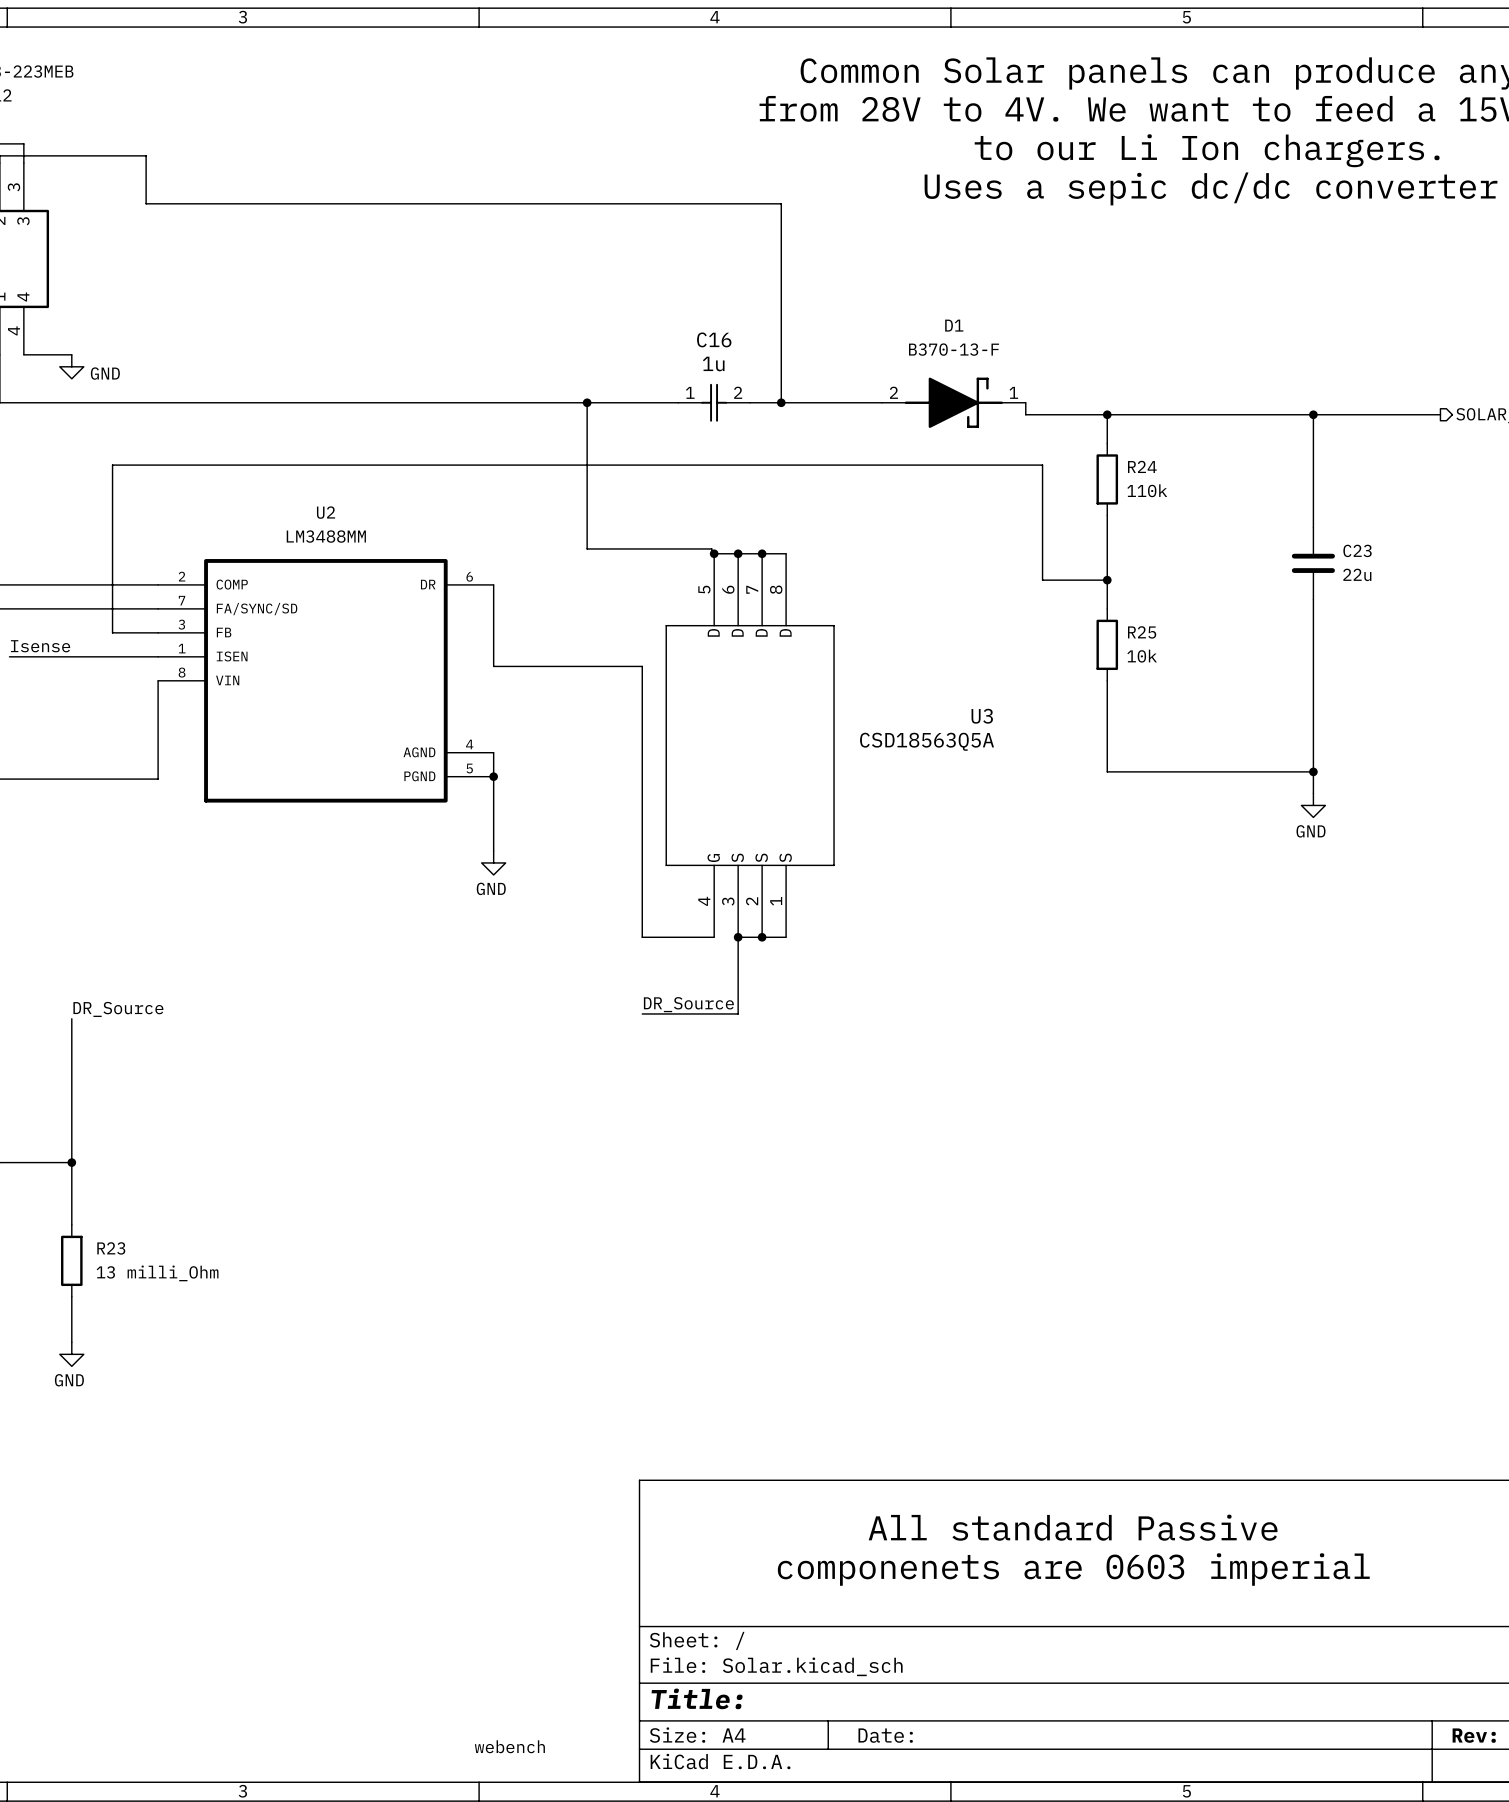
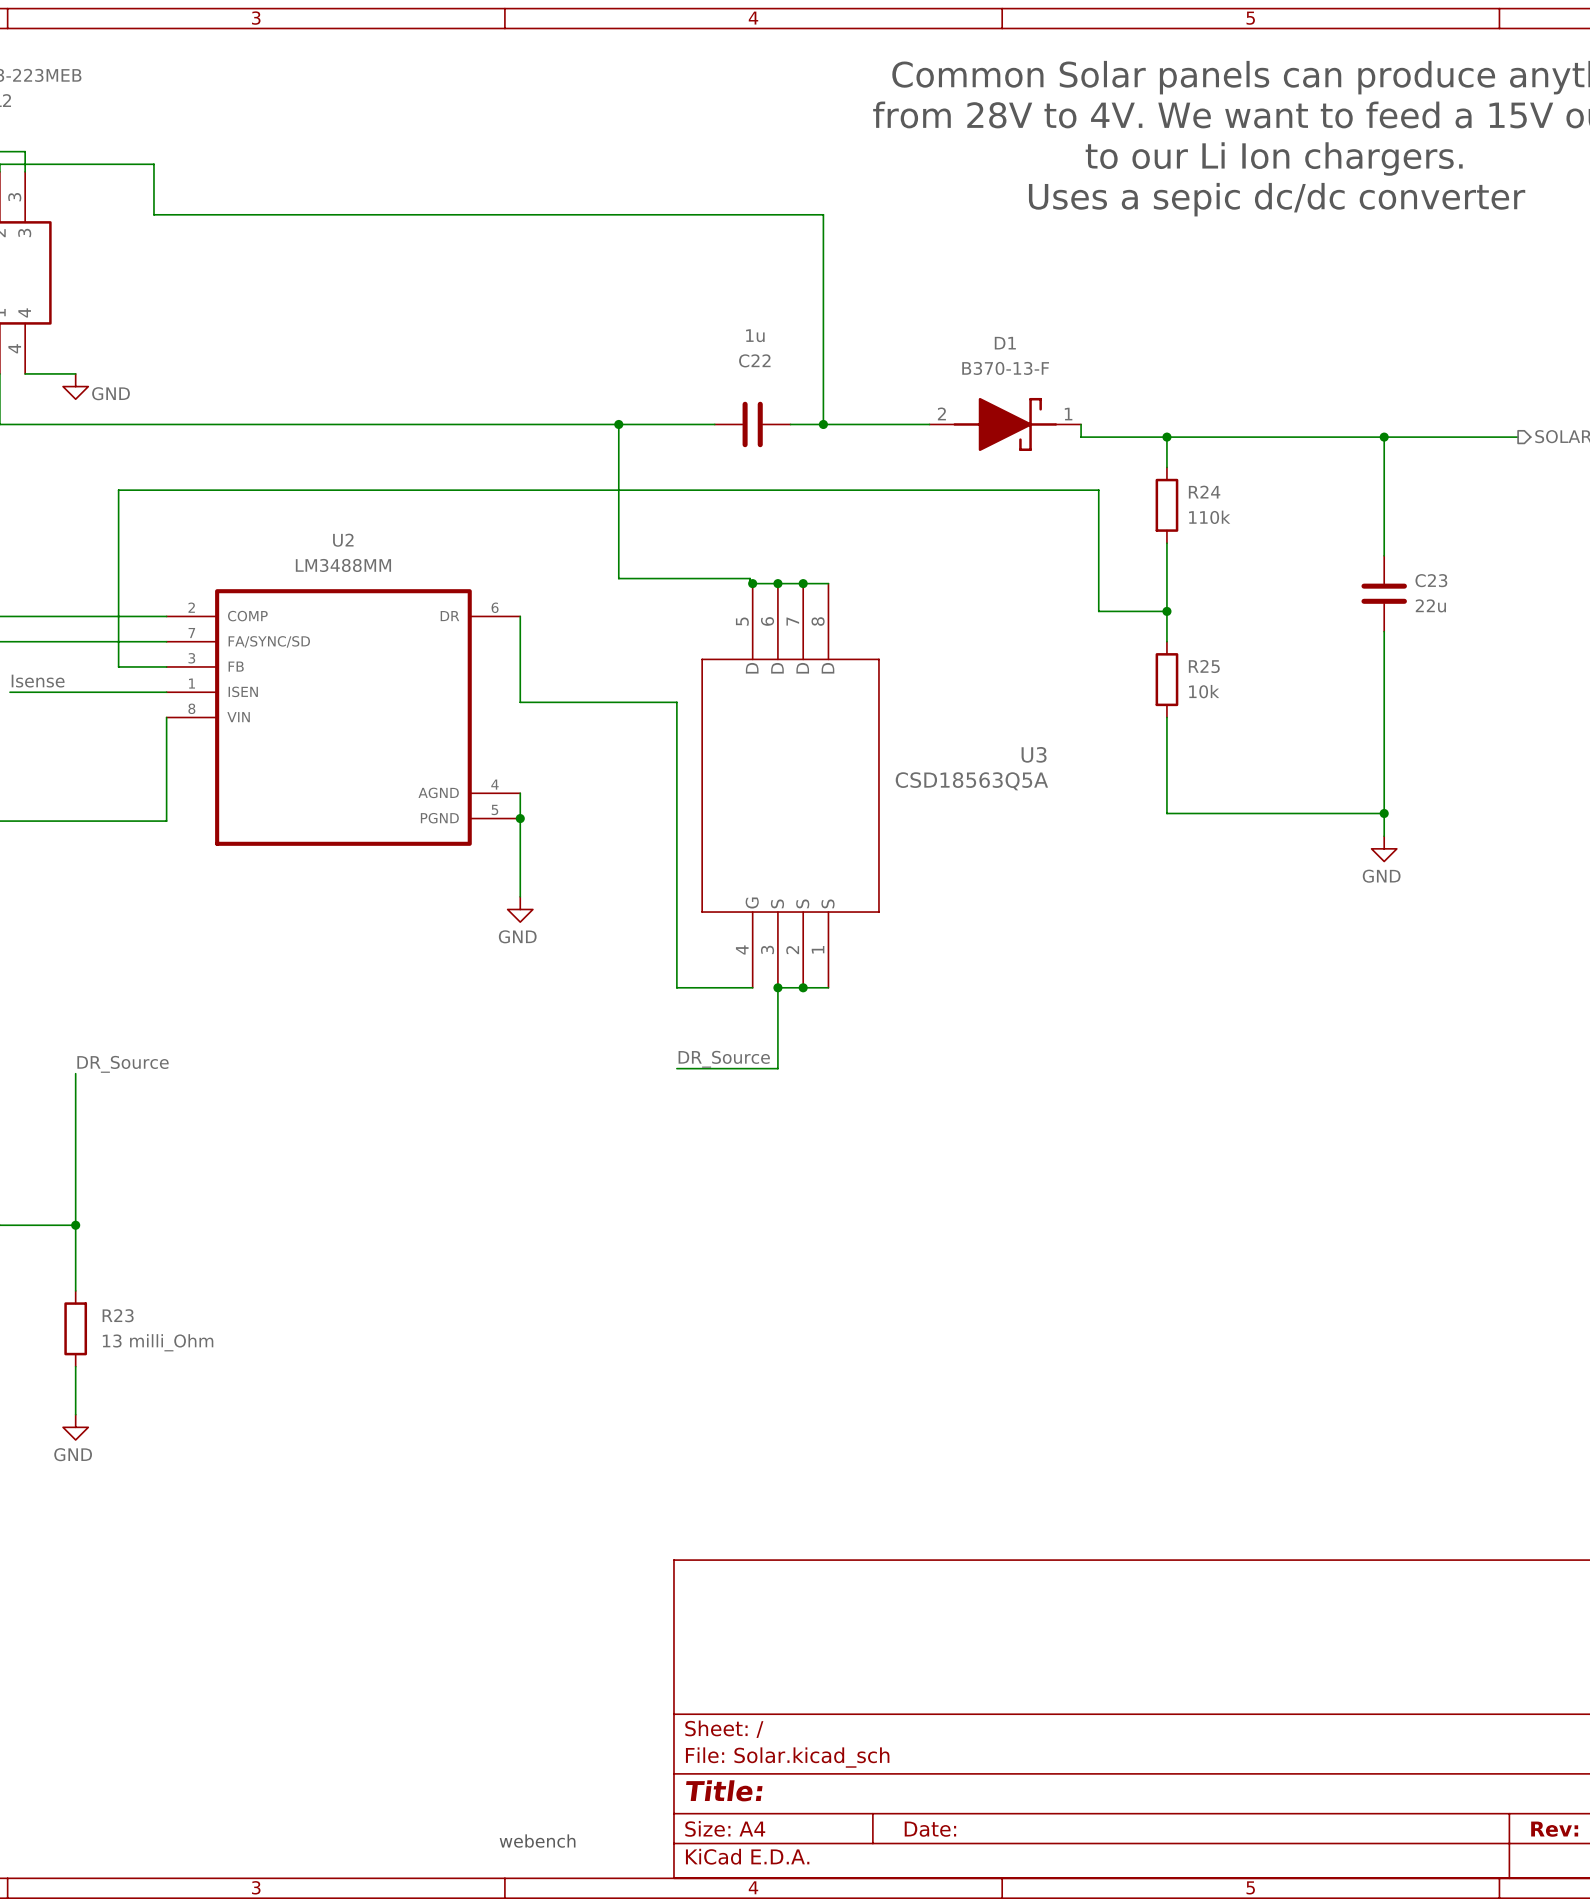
C16: 1u (714, 402) -> none
C22: none -> 1u (752, 424)
text: All standard Passive (1073, 1527) -> none
text: componenets are 0603 imperial (1073, 1569) -> none

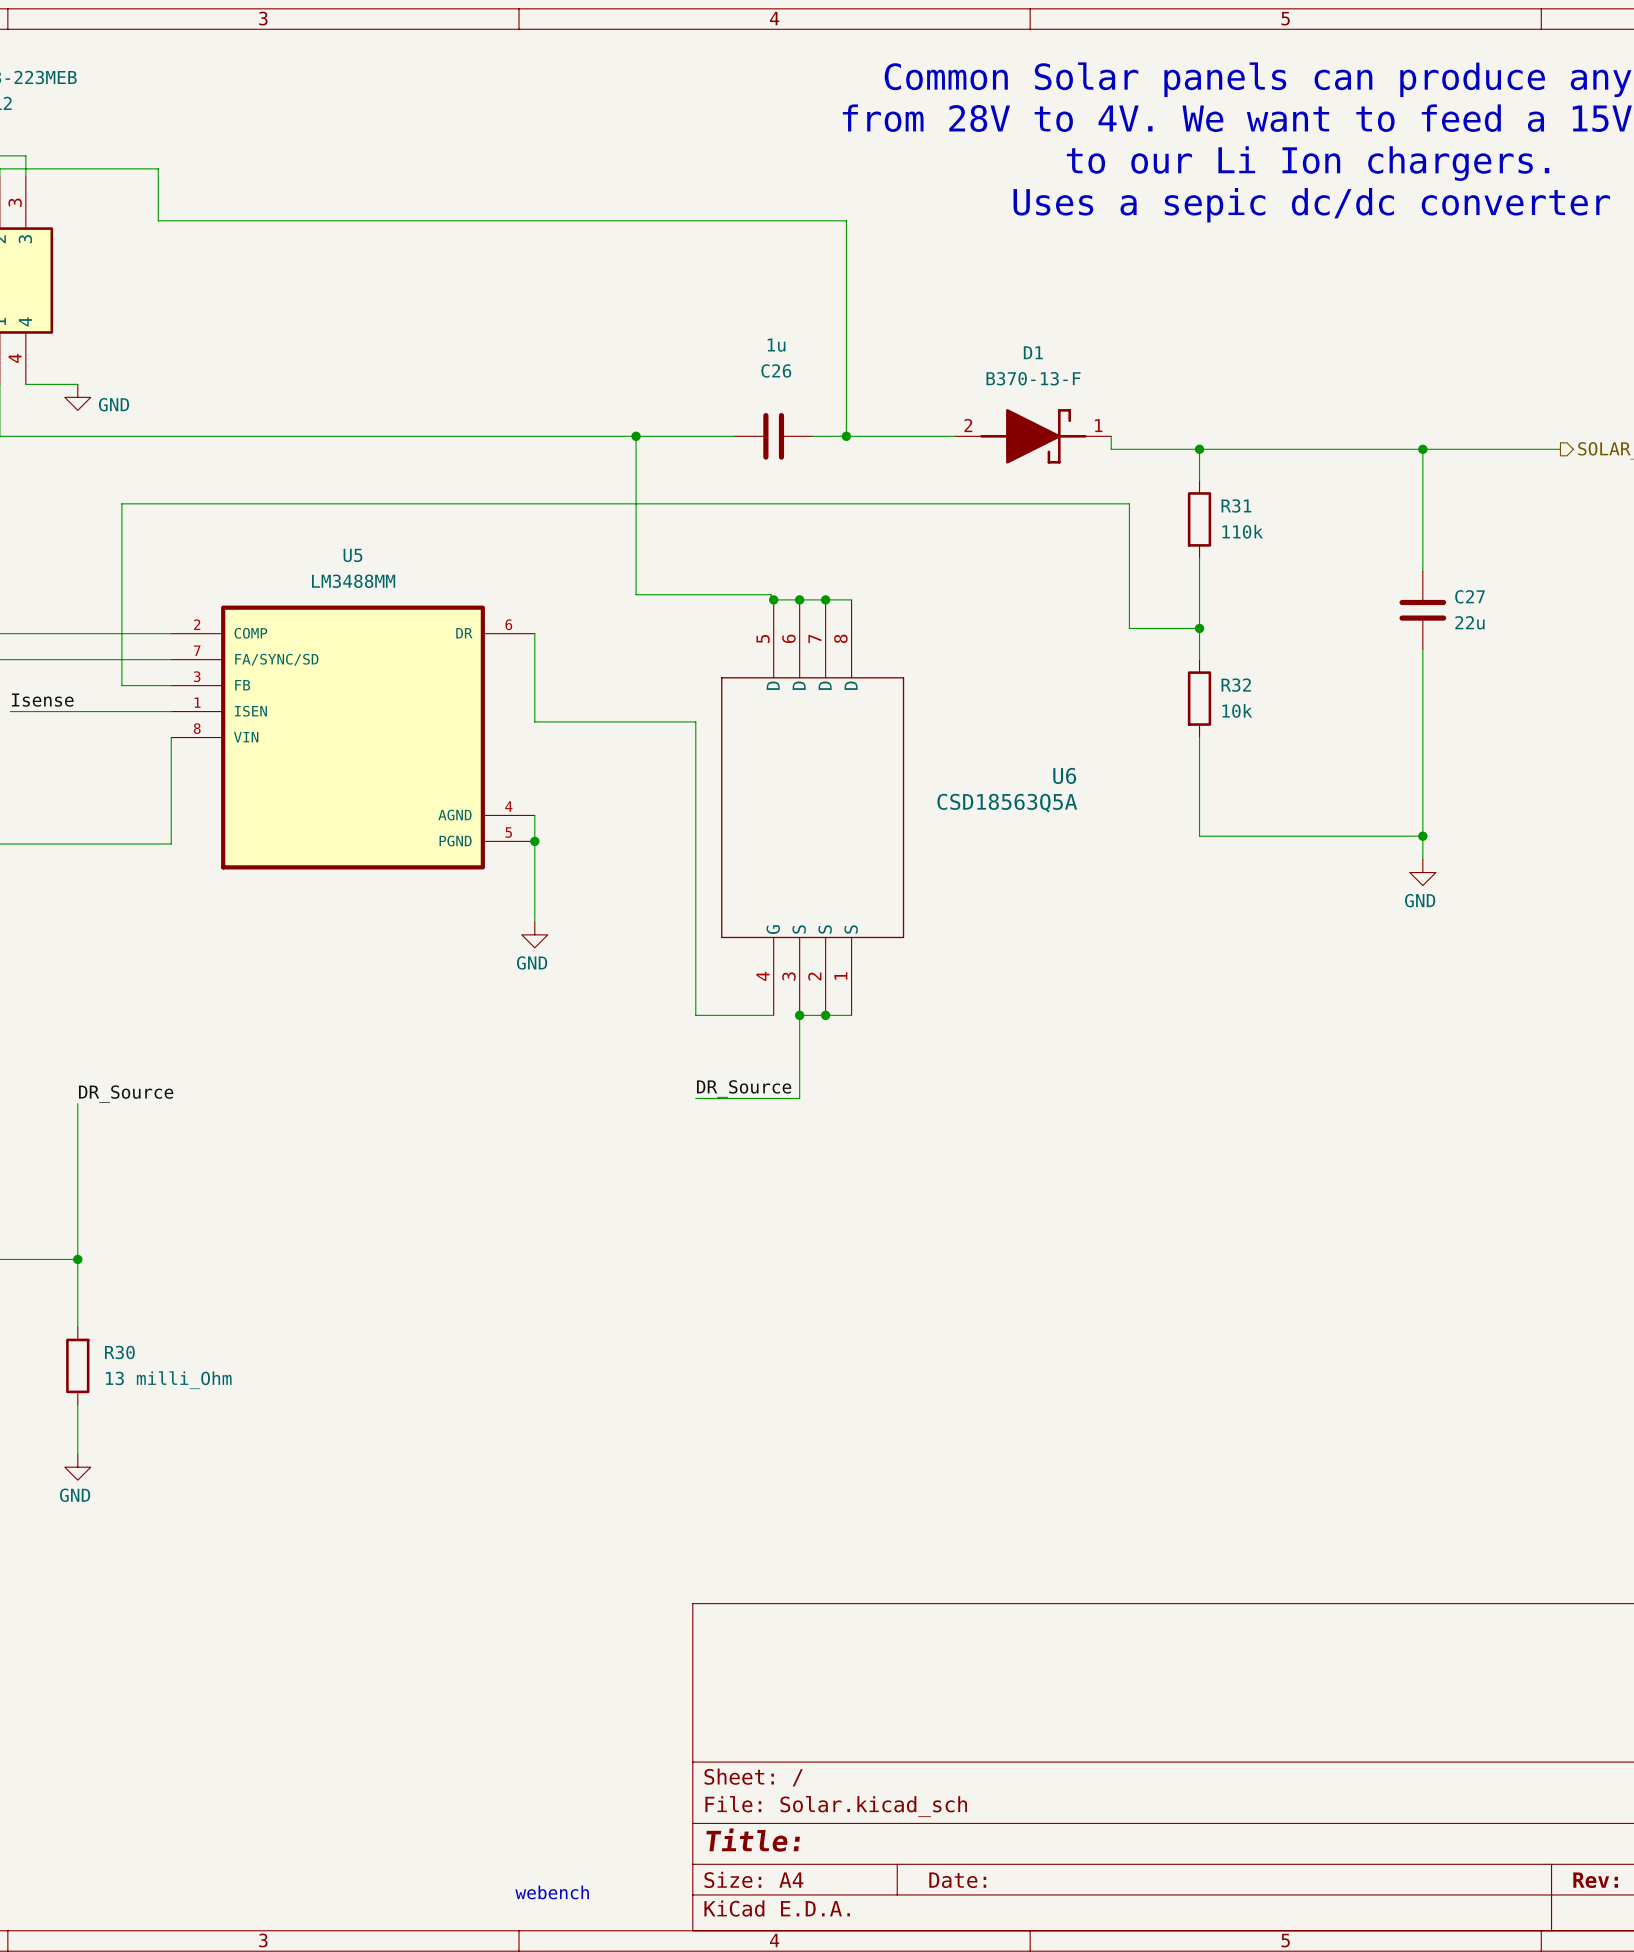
C22 name: C22 (754, 360) -> C26 (776, 370)
R24 name: R24 (1204, 492) -> R31 (1236, 505)
U2 name: U2 (343, 540) -> U5 (352, 555)
C23 name: C23 (1431, 580) -> C27 (1470, 596)
R25 name: R25 (1204, 666) -> R32 (1236, 685)
U3 name: U3 (1034, 754) -> U6 (1064, 775)
R23 name: R23 (118, 1315) -> R30 (119, 1352)

